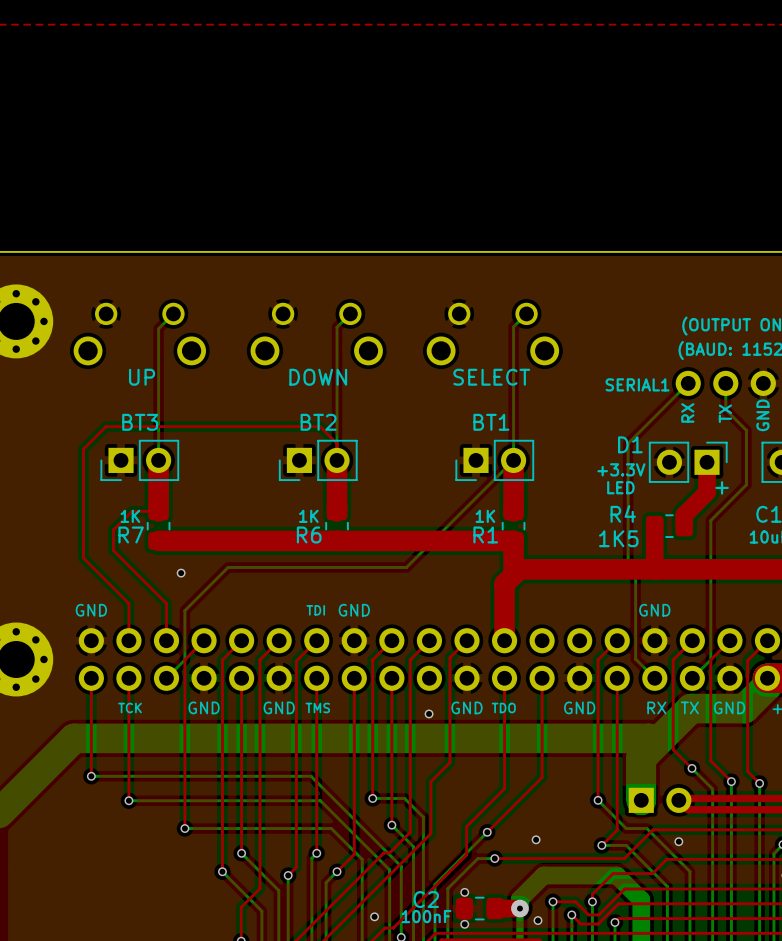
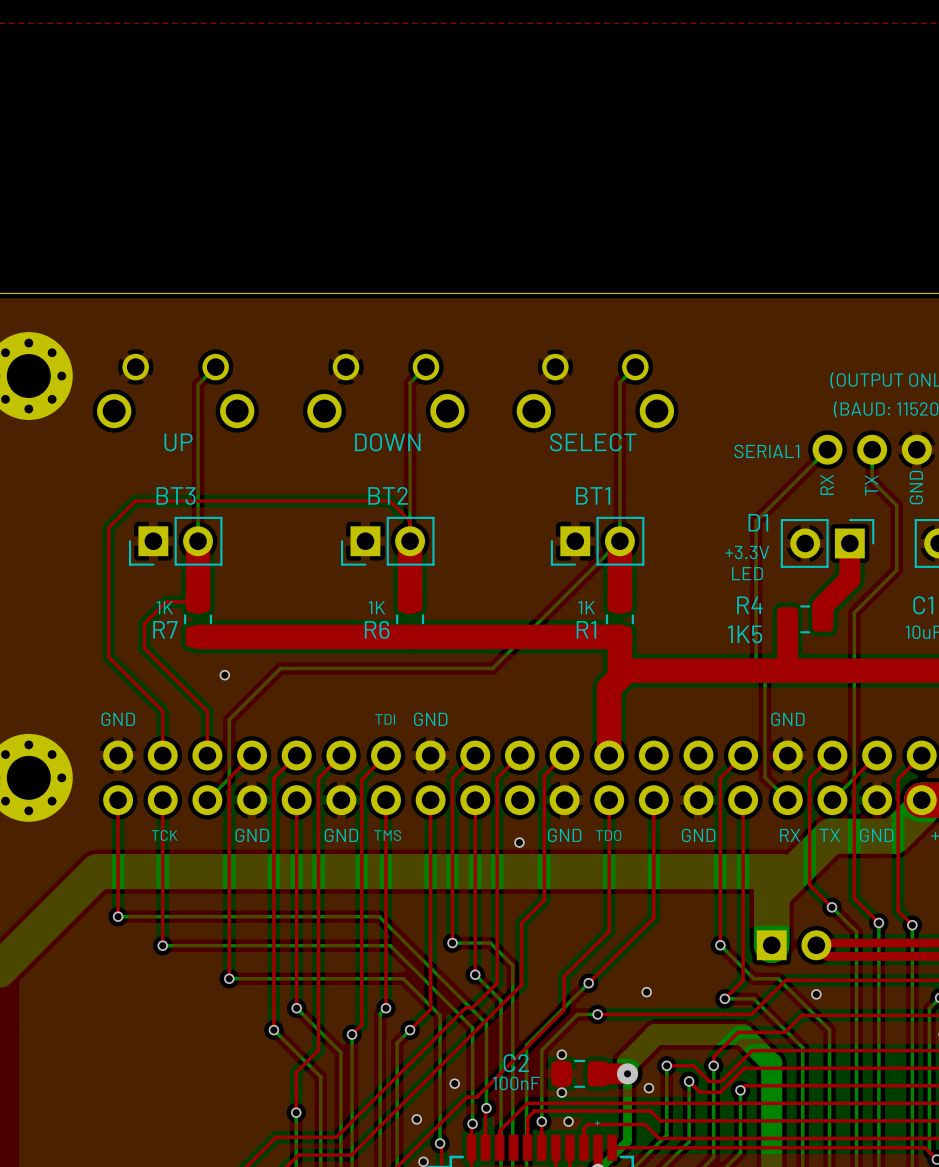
text: + (722, 487) -> none

